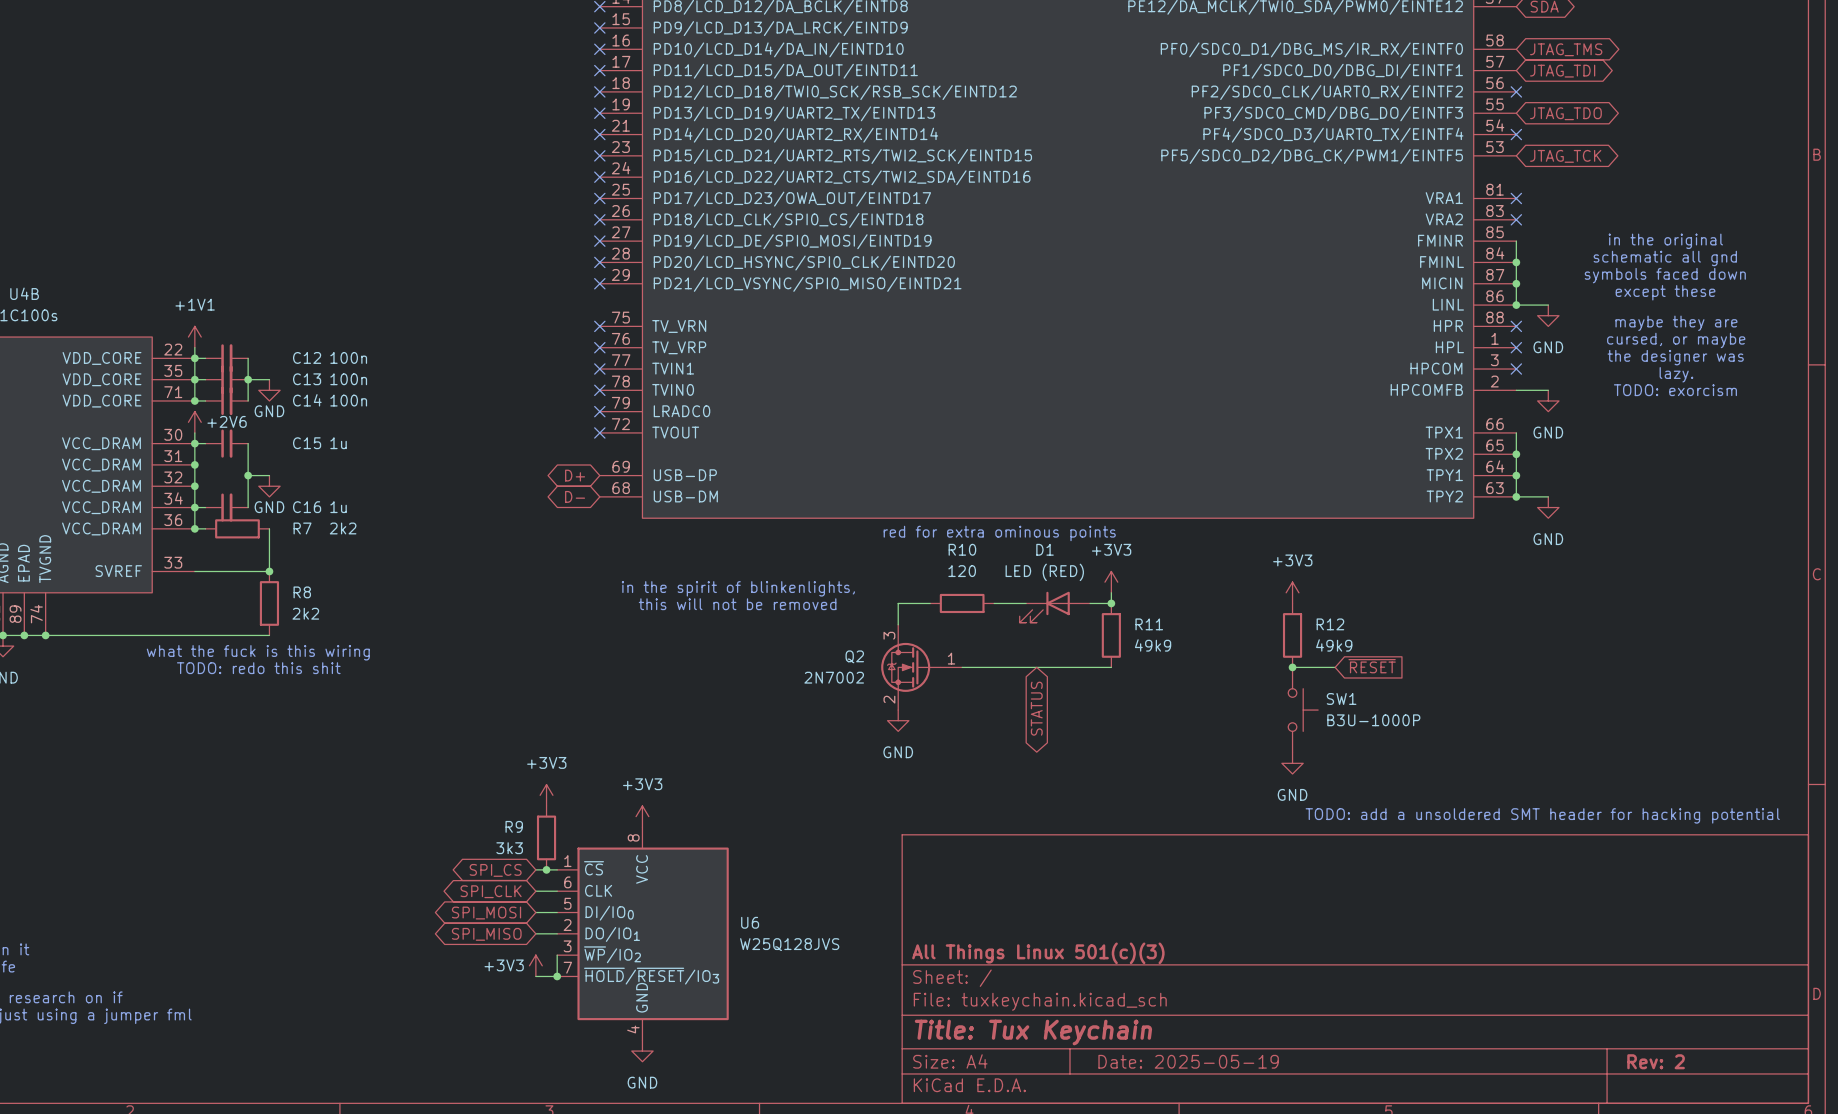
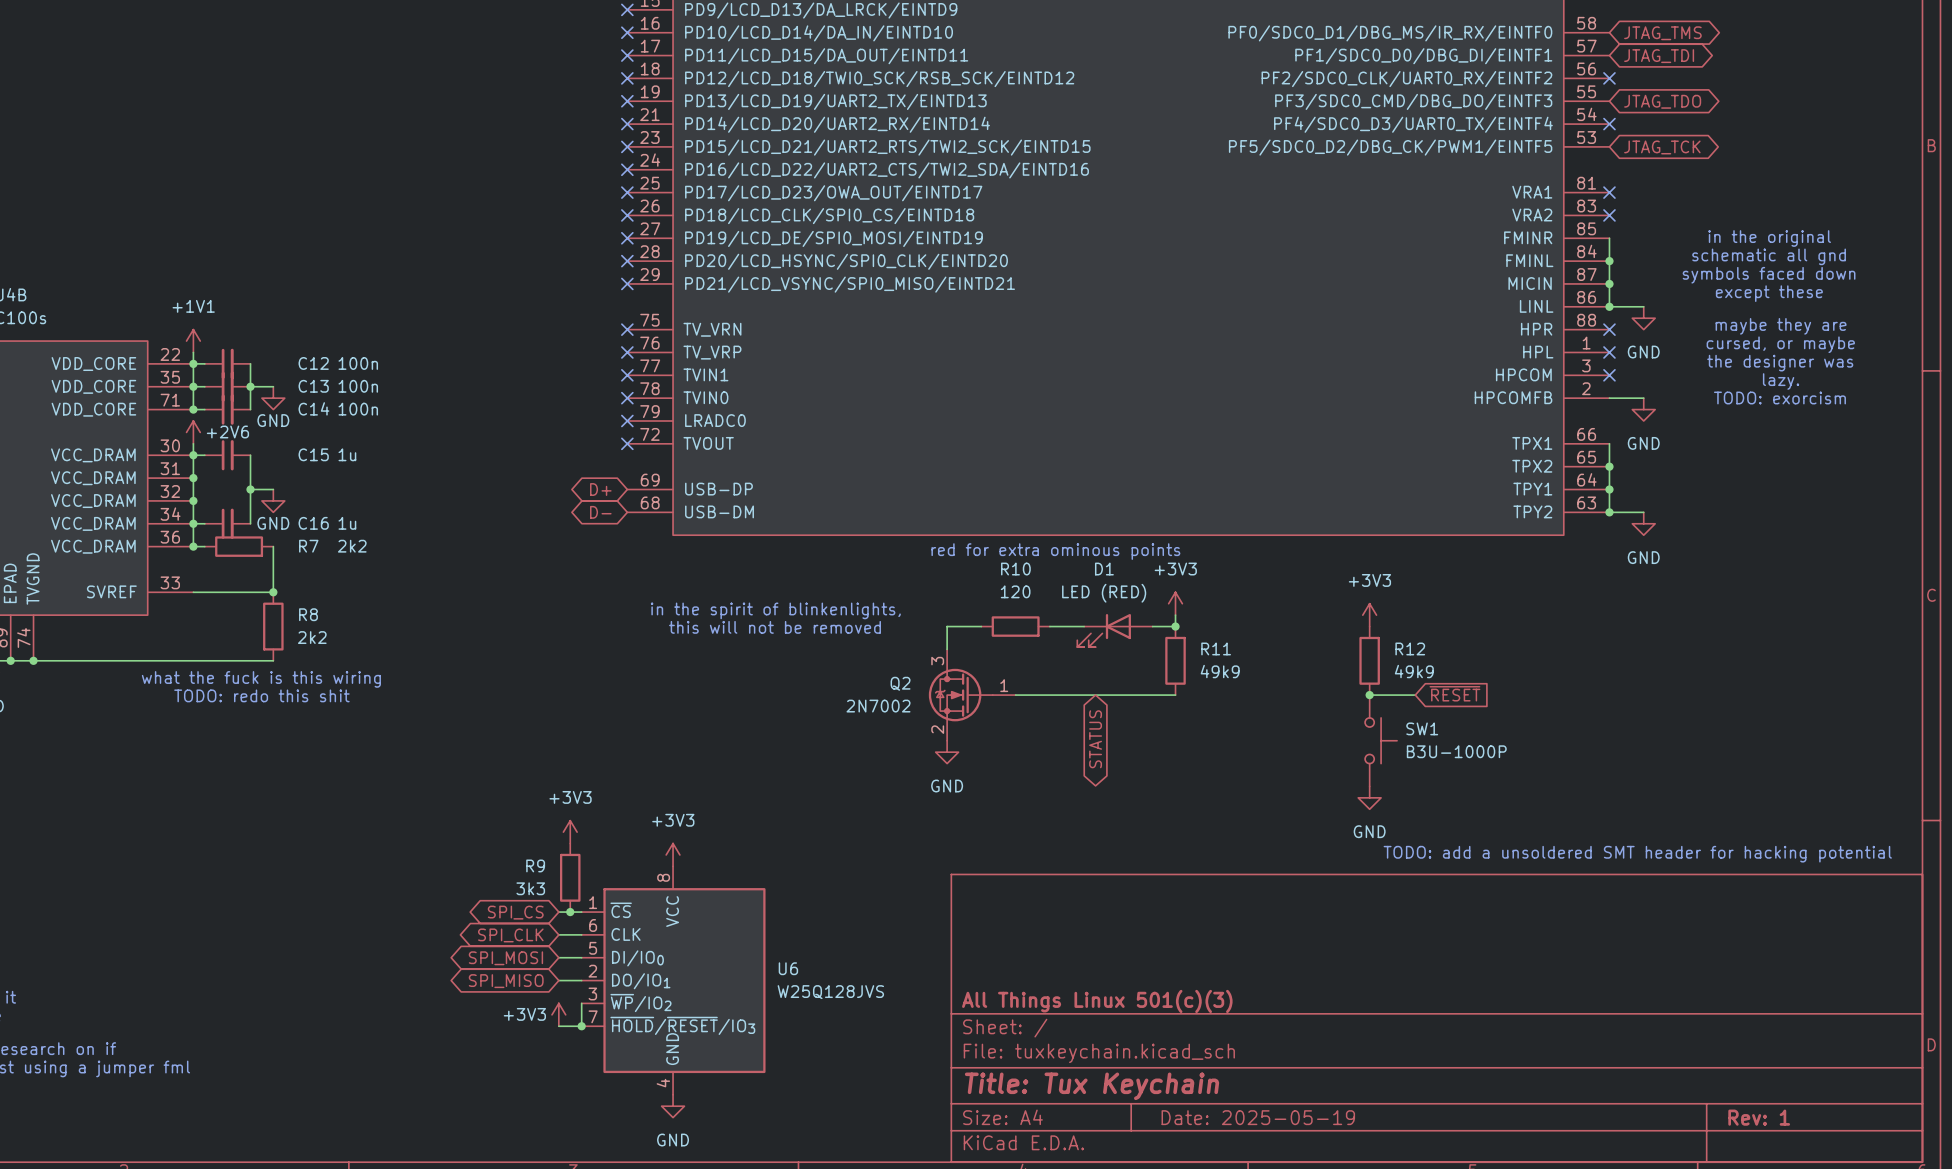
title block: Rev: 2 (1656, 1061) -> Rev: 1 (1759, 1117)

